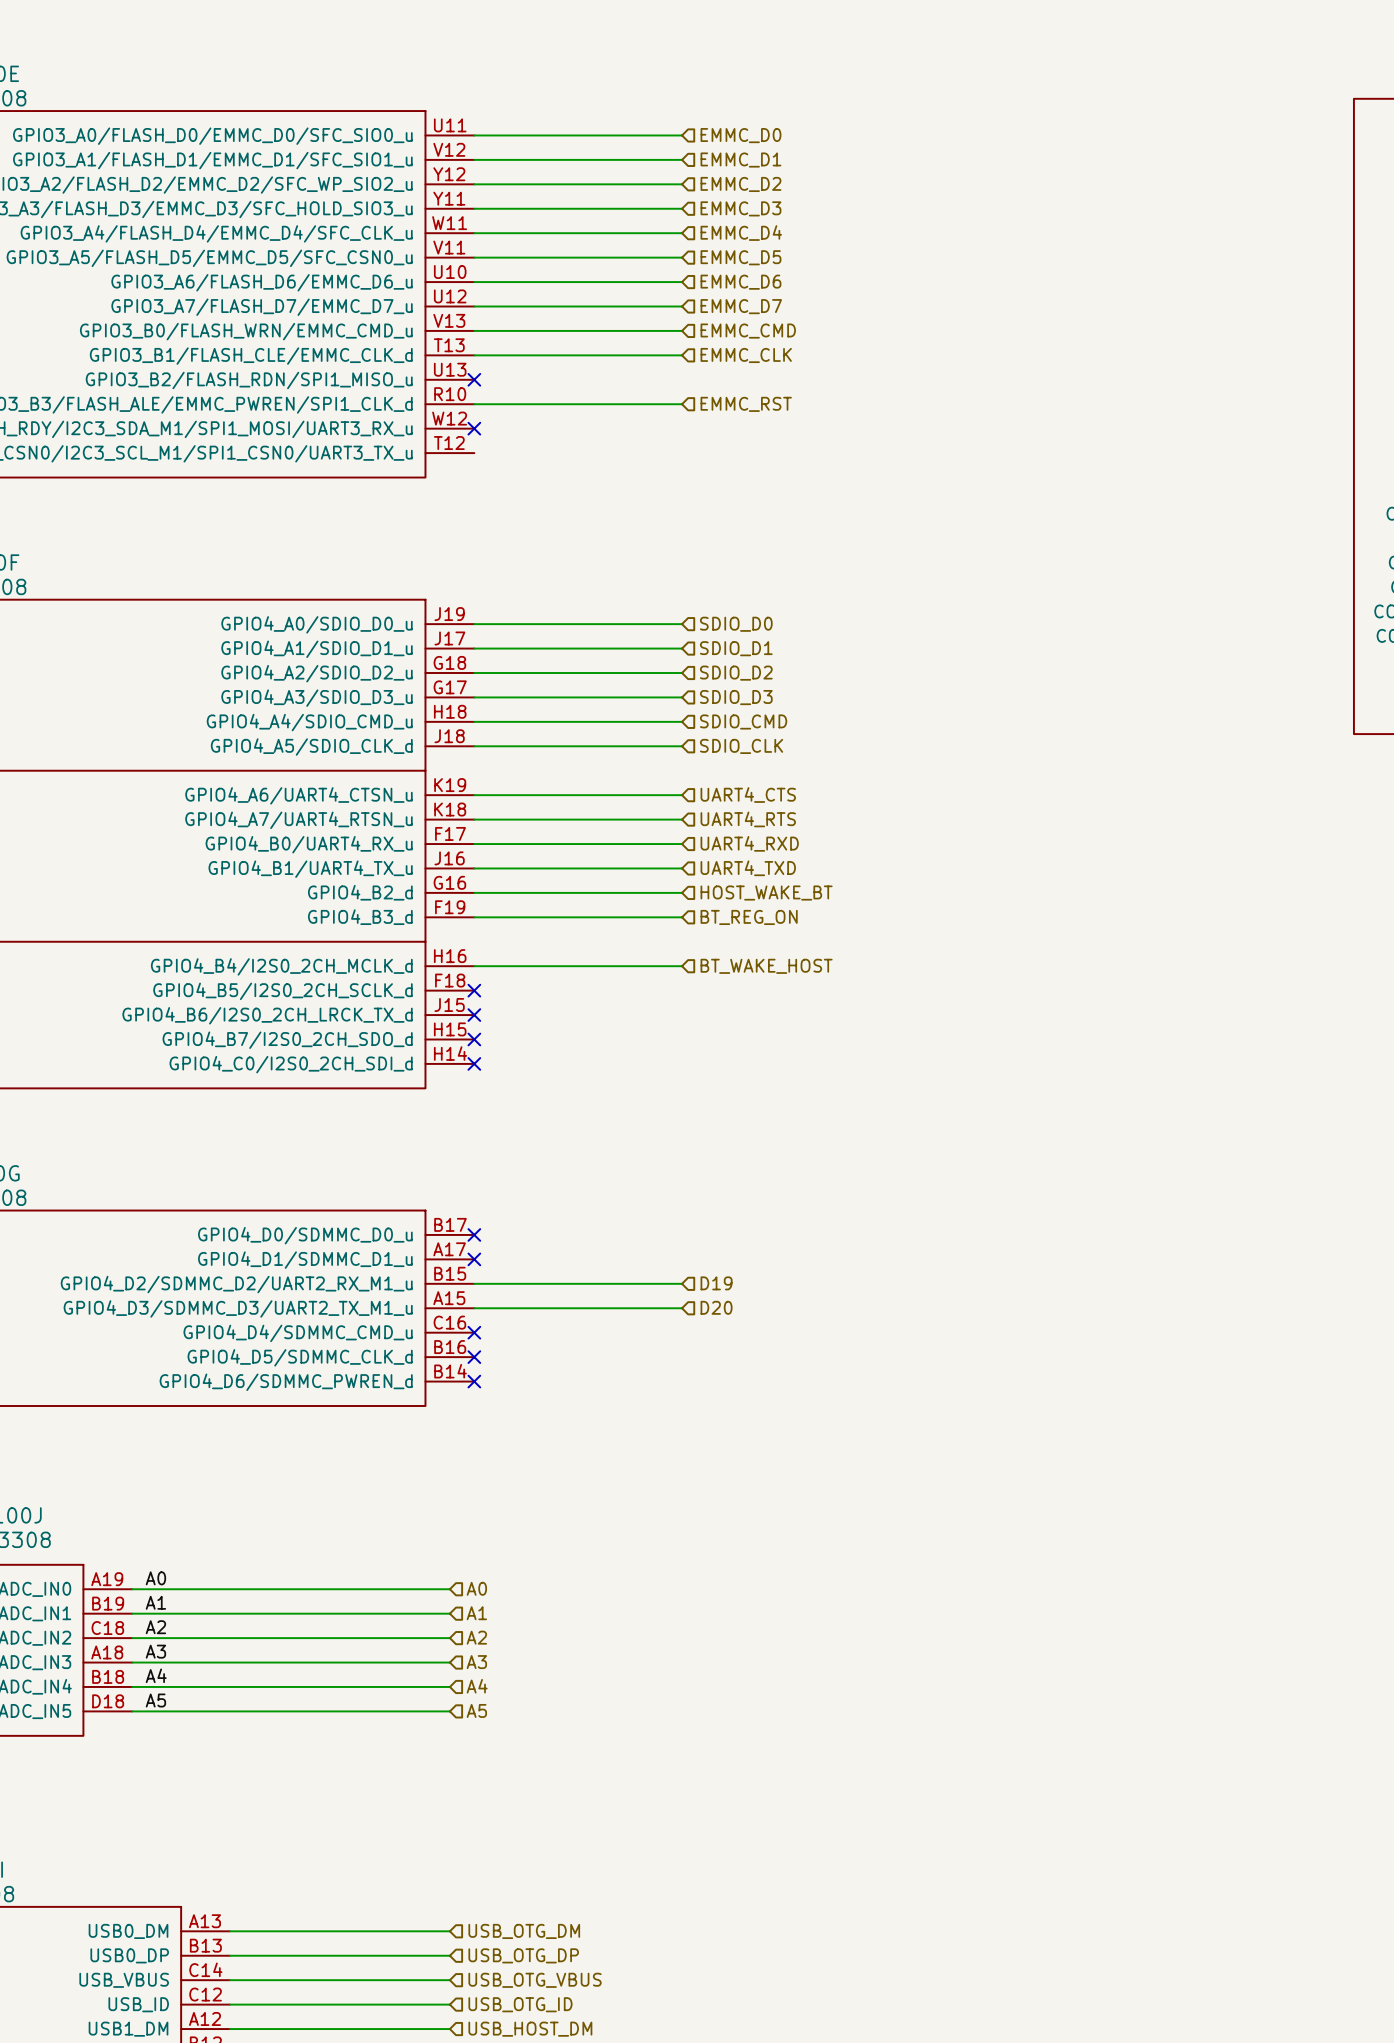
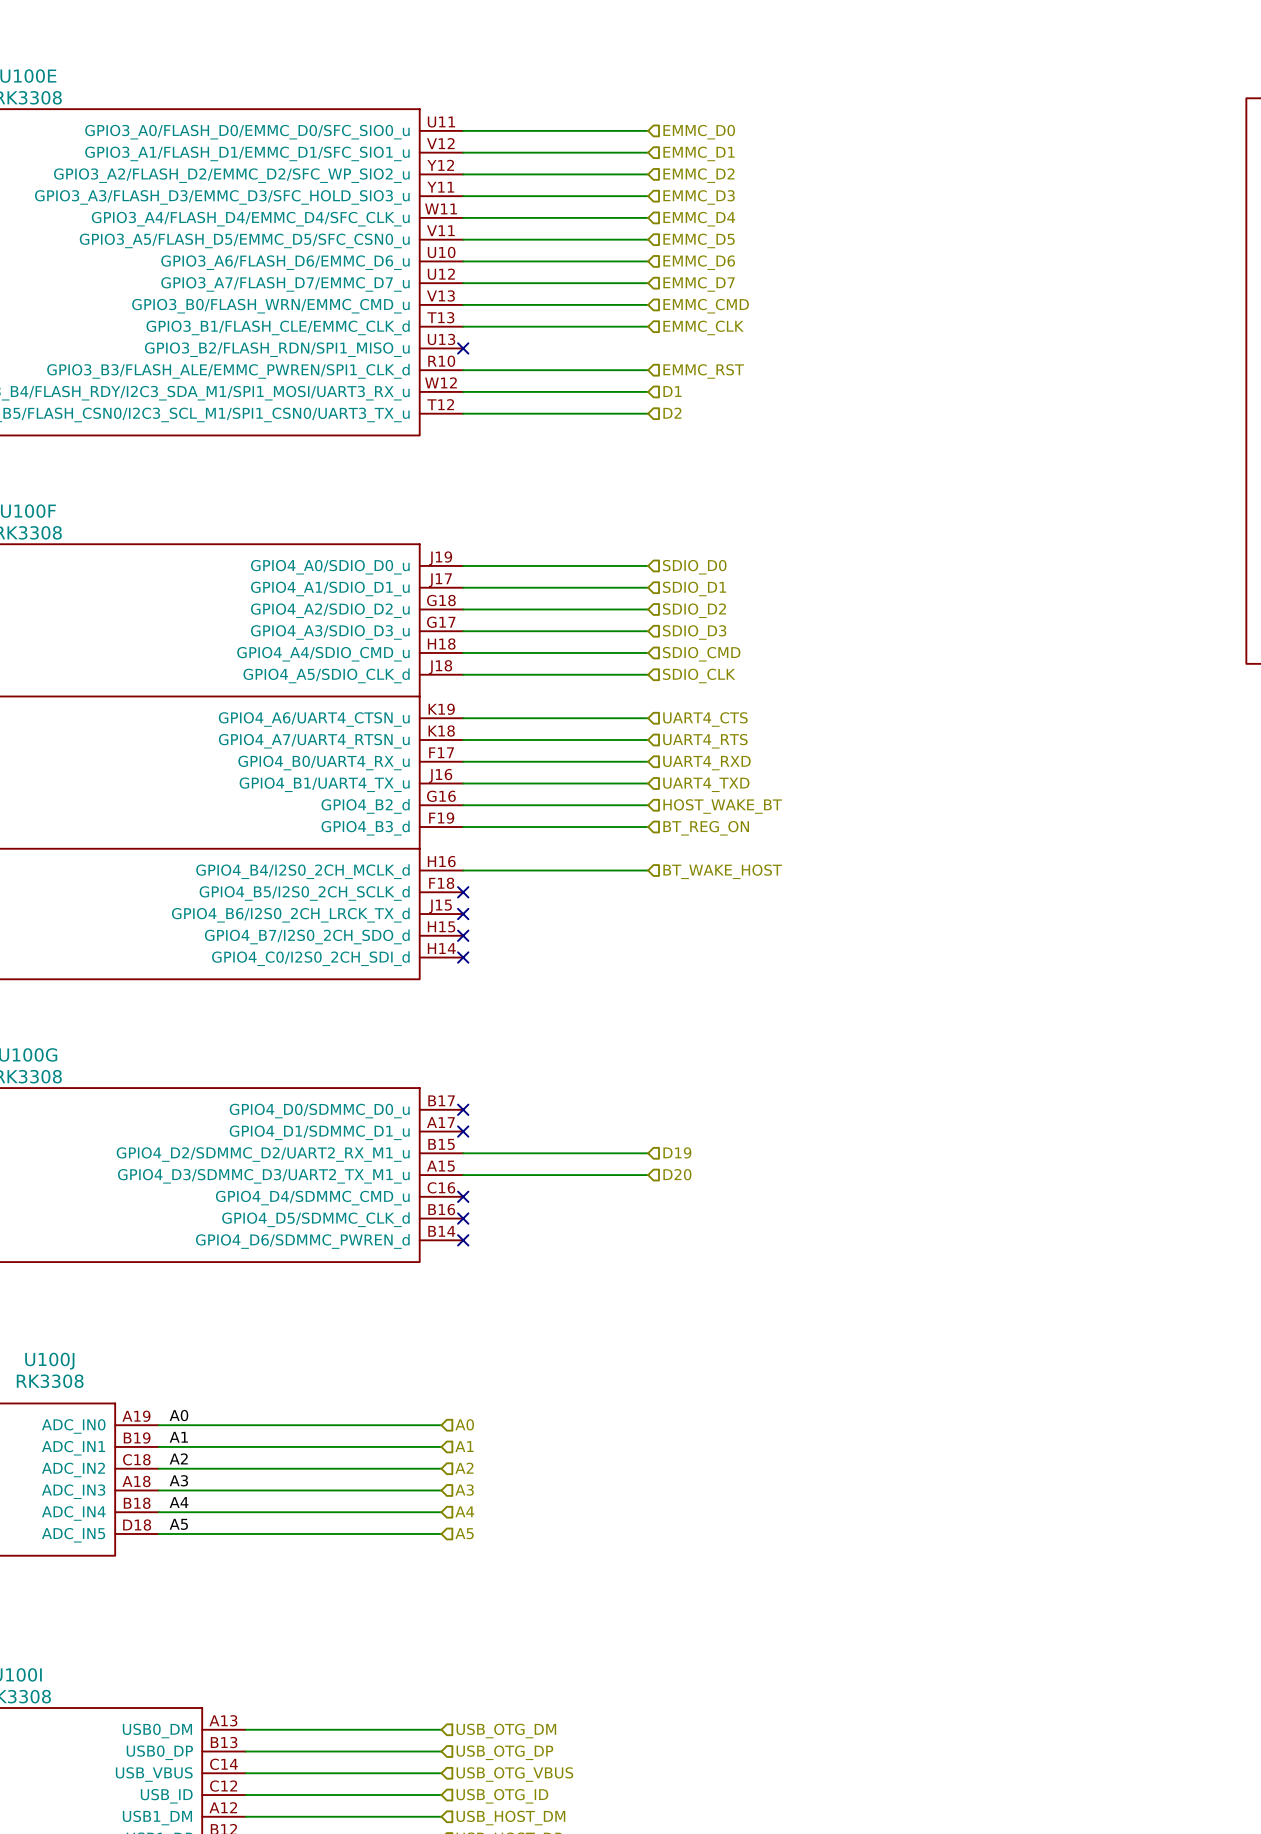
wire: none -> (463, 391) (648, 391)
no-connect mark: (474, 428) -> none
hierarchical label: none -> D1 (672, 391)
hierarchical label: none -> D2 (672, 413)
wire: none -> (463, 413) (648, 413)

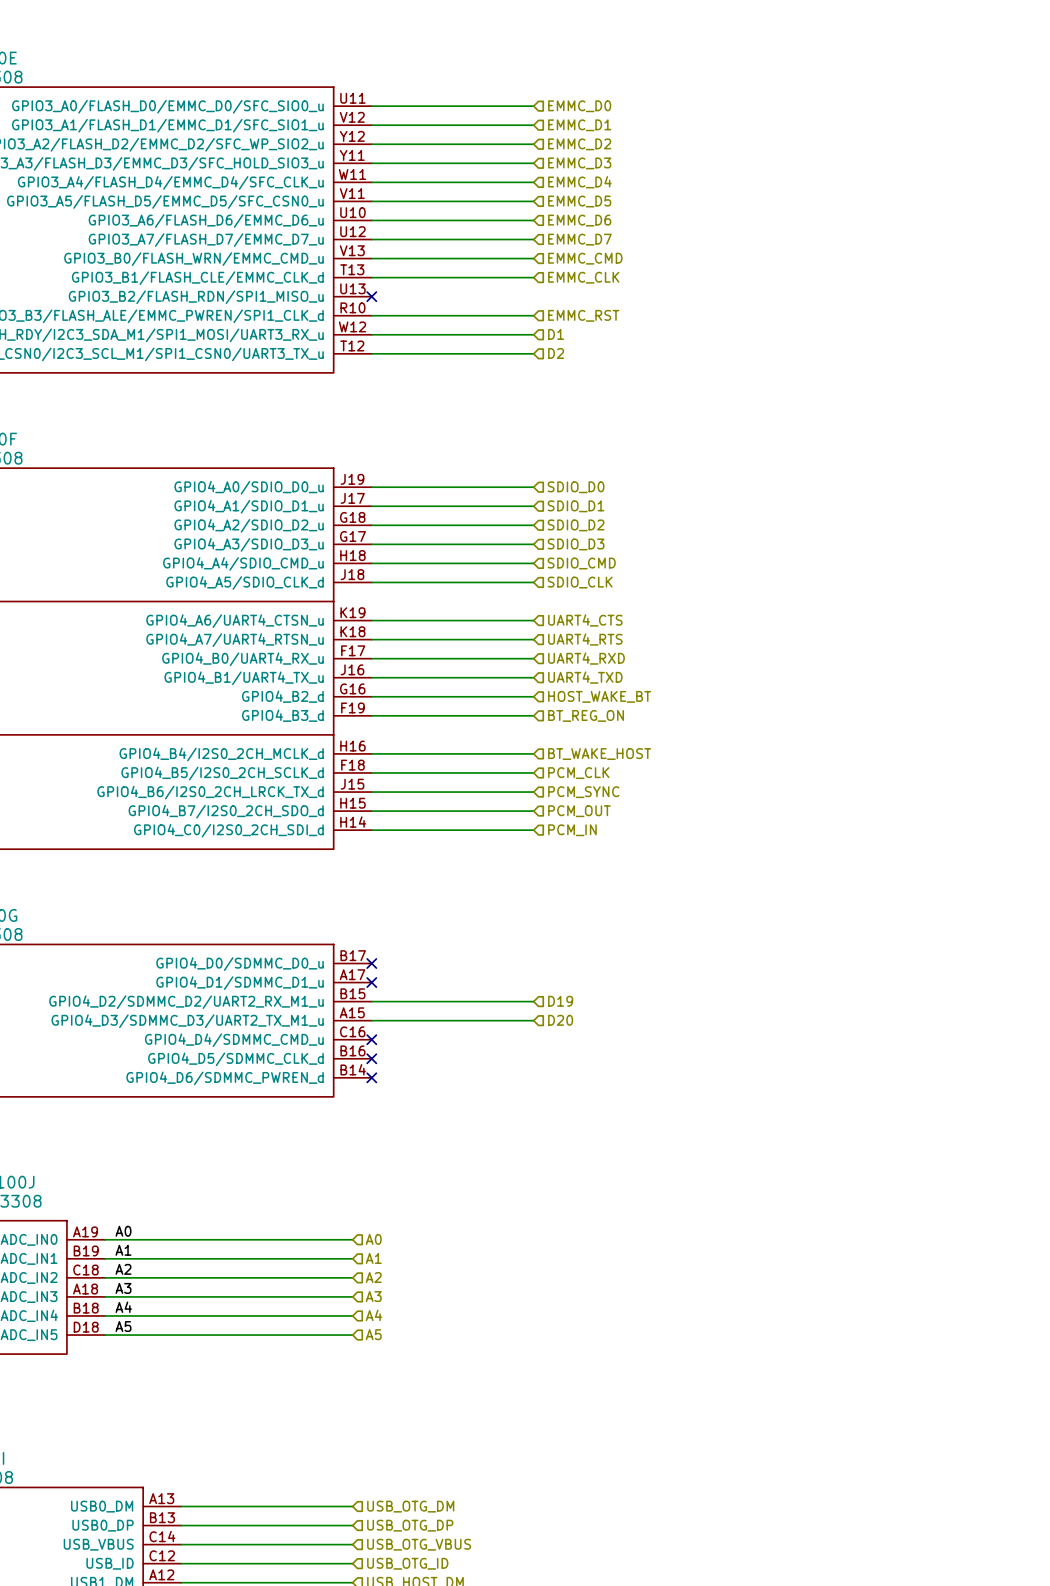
wire: none -> (371, 772) (533, 772)
no-connect mark: (463, 892) -> none
hierarchical label: none -> PCM_CLK (578, 773)
wire: none -> (371, 792) (533, 792)
no-connect mark: (463, 914) -> none
hierarchical label: none -> PCM_SYNC (583, 792)
wire: none -> (371, 811) (533, 811)
no-connect mark: (463, 935) -> none
hierarchical label: none -> PCM_OUT (579, 811)
wire: none -> (371, 830) (533, 830)
no-connect mark: (463, 957) -> none
hierarchical label: none -> PCM_IN (572, 830)

